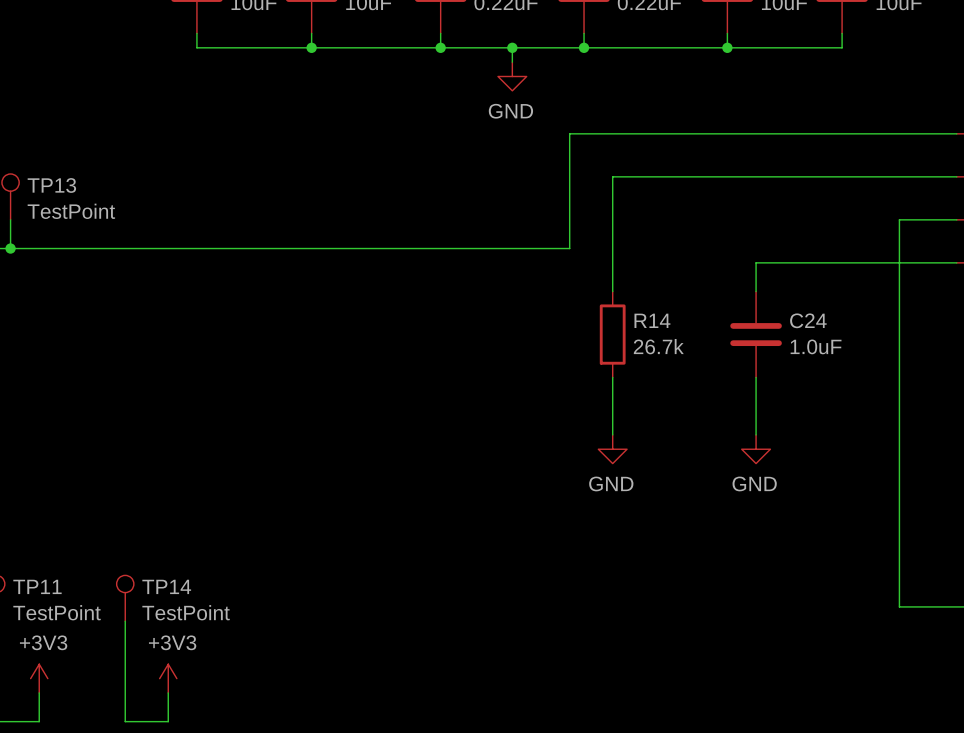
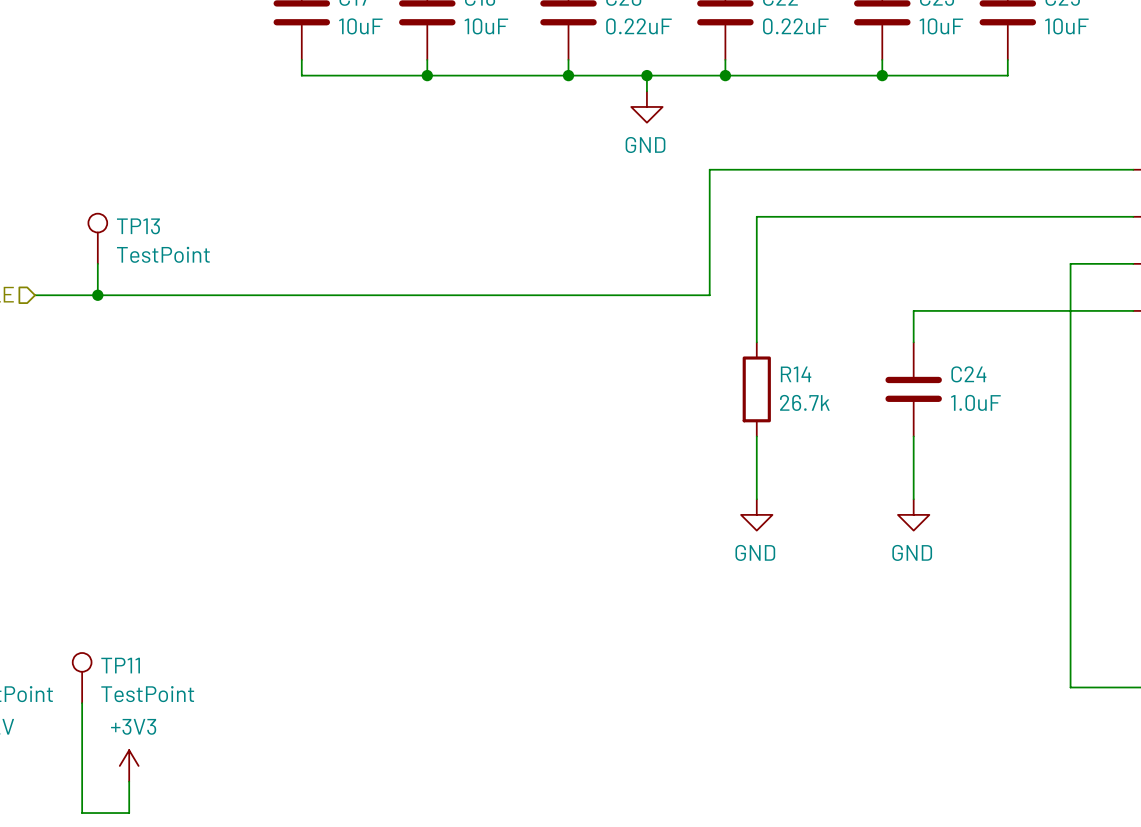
TP14: TestPoint (125, 598) -> none
wire: (125, 621) (125, 721) (168, 721) (168, 692) -> none
power symbol: +3V3 (168, 678) -> none

